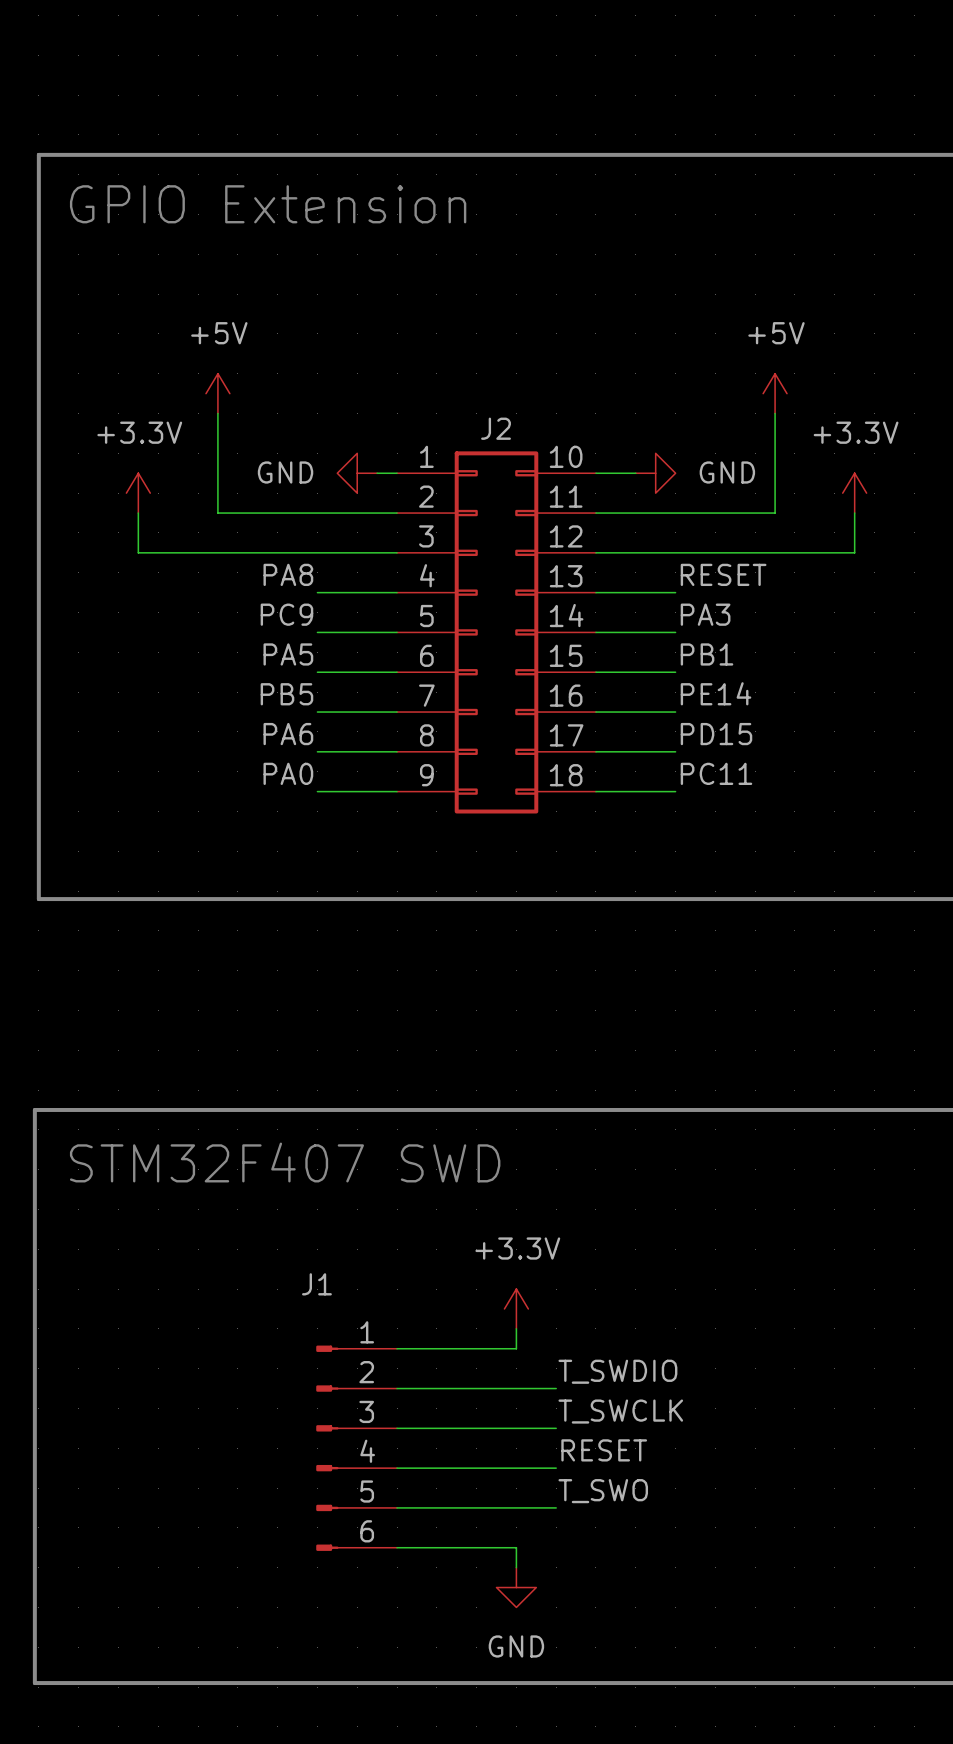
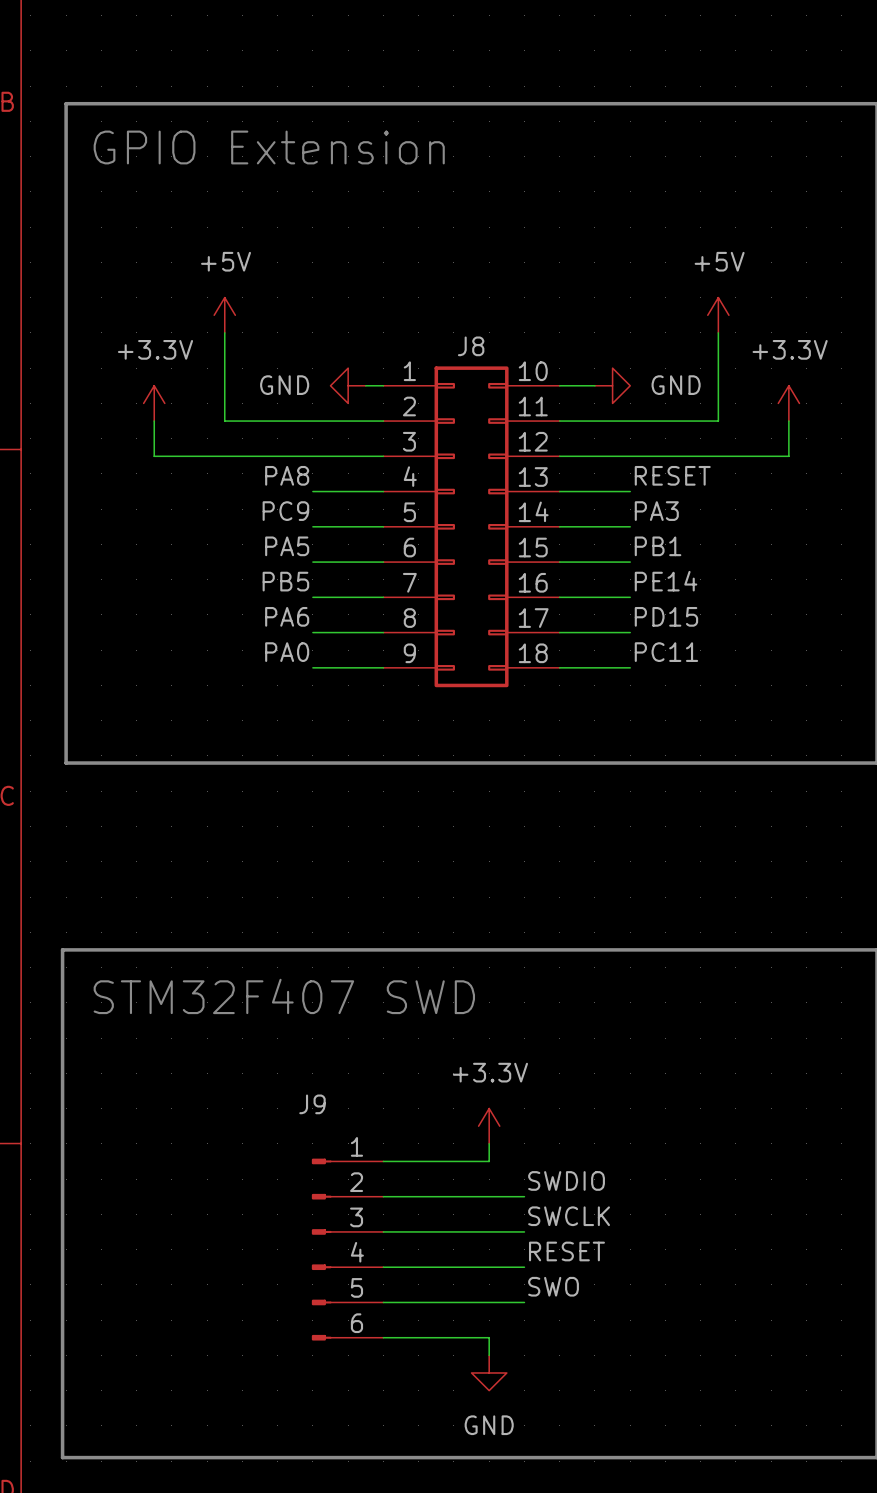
J2 name: J2 (496, 428) -> J8 (471, 346)
J1 name: J1 (316, 1284) -> J9 (312, 1104)
label: T_SWDIO (617, 1371) -> SWDIO (566, 1180)
label: T_SWCLK (620, 1411) -> SWCLK (569, 1216)
label: T_SWO (603, 1491) -> SWO (553, 1286)

